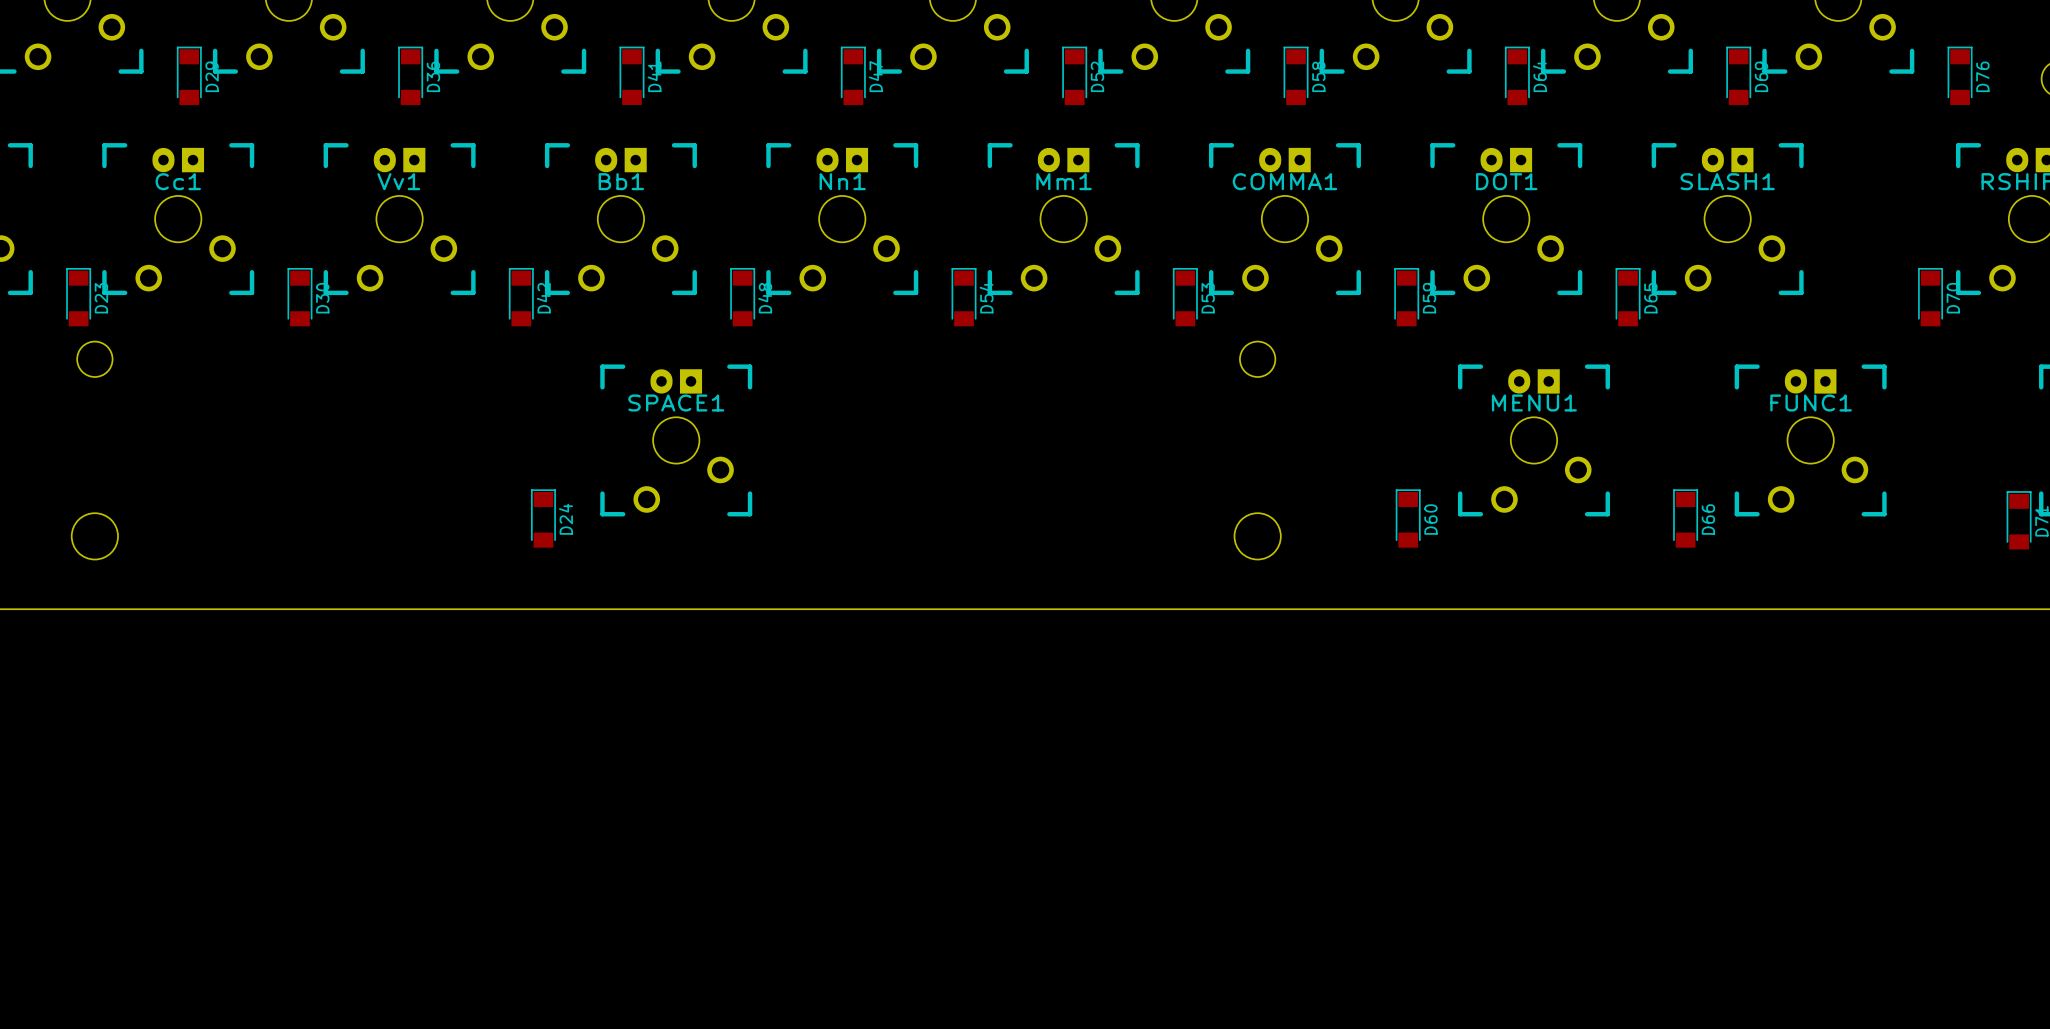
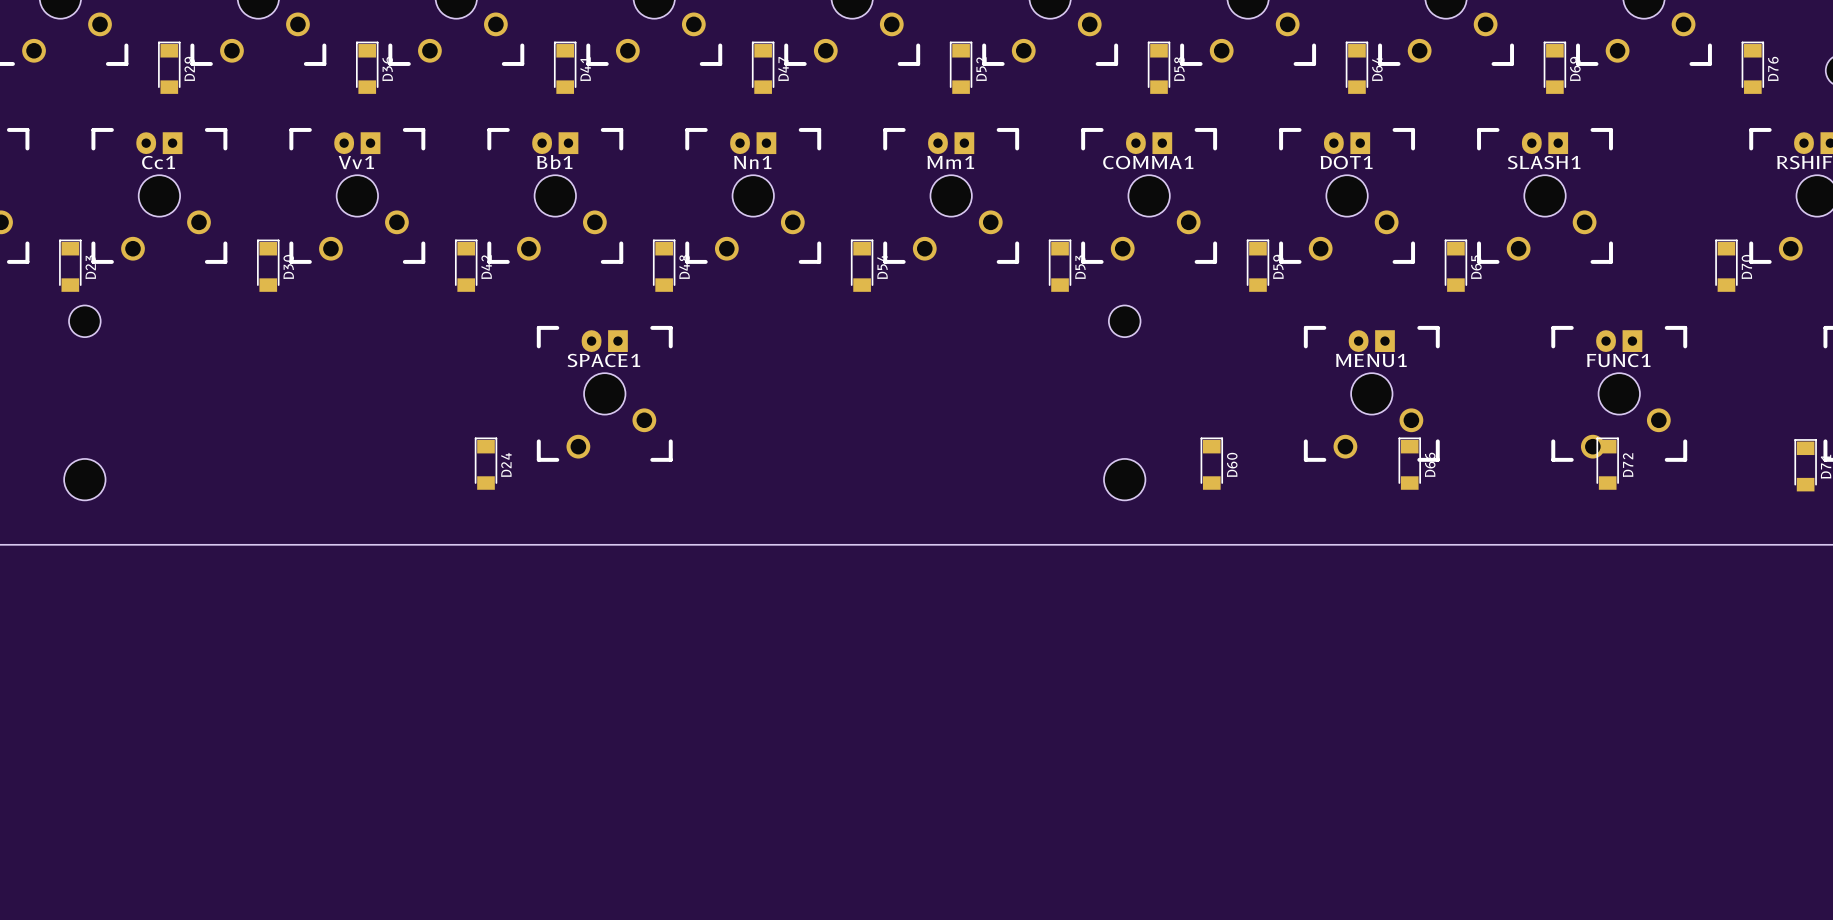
D60 position: (1408, 518) -> (1211, 463)
D66 position: (1685, 518) -> (1409, 463)
D72: none -> (1607, 463)

